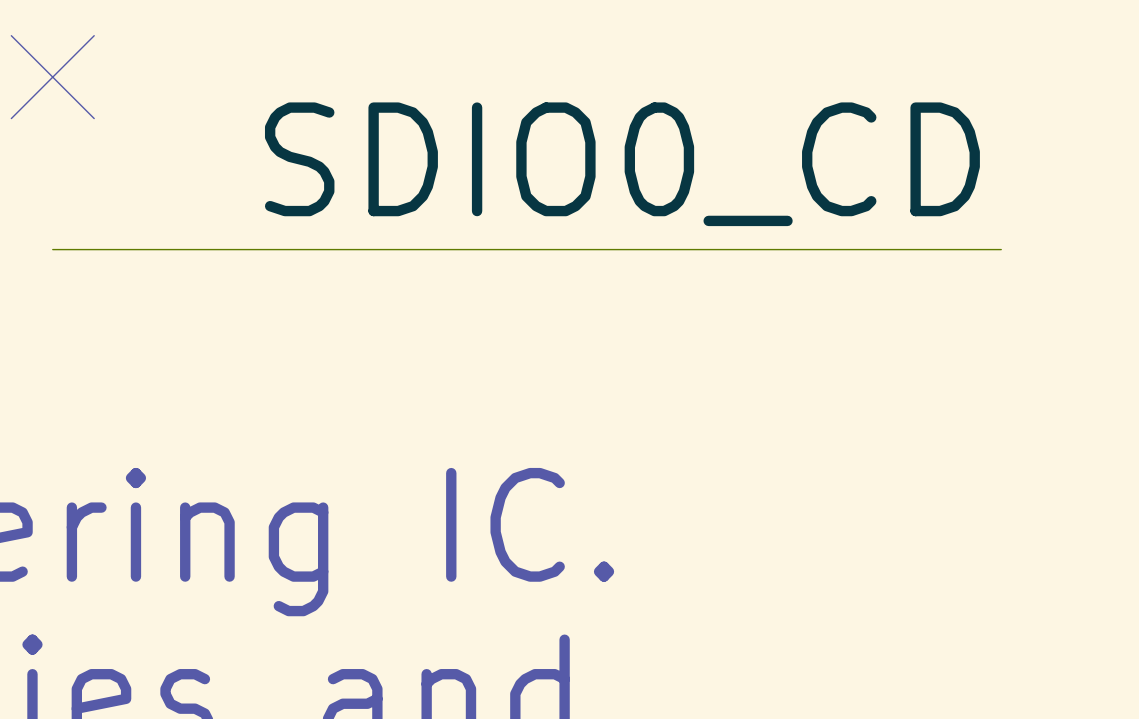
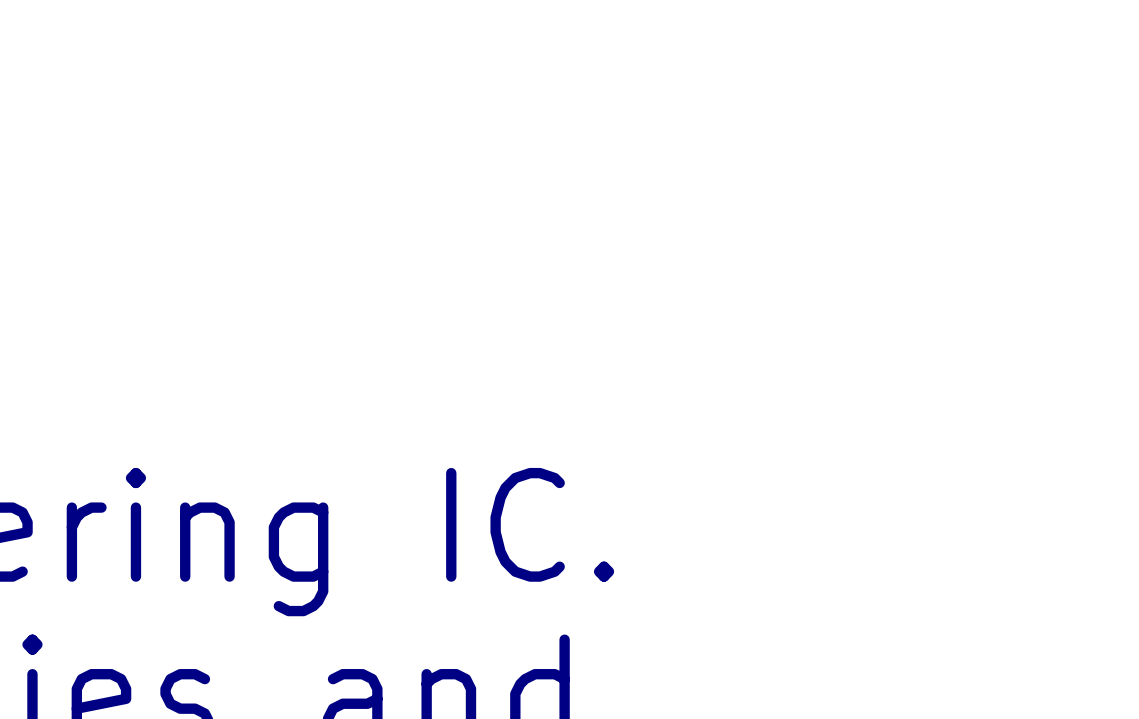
no-connect mark: (52, 77) -> none
label: SDIO0_CD (622, 164) -> none
wire: (52, 249) (1001, 249) -> none

